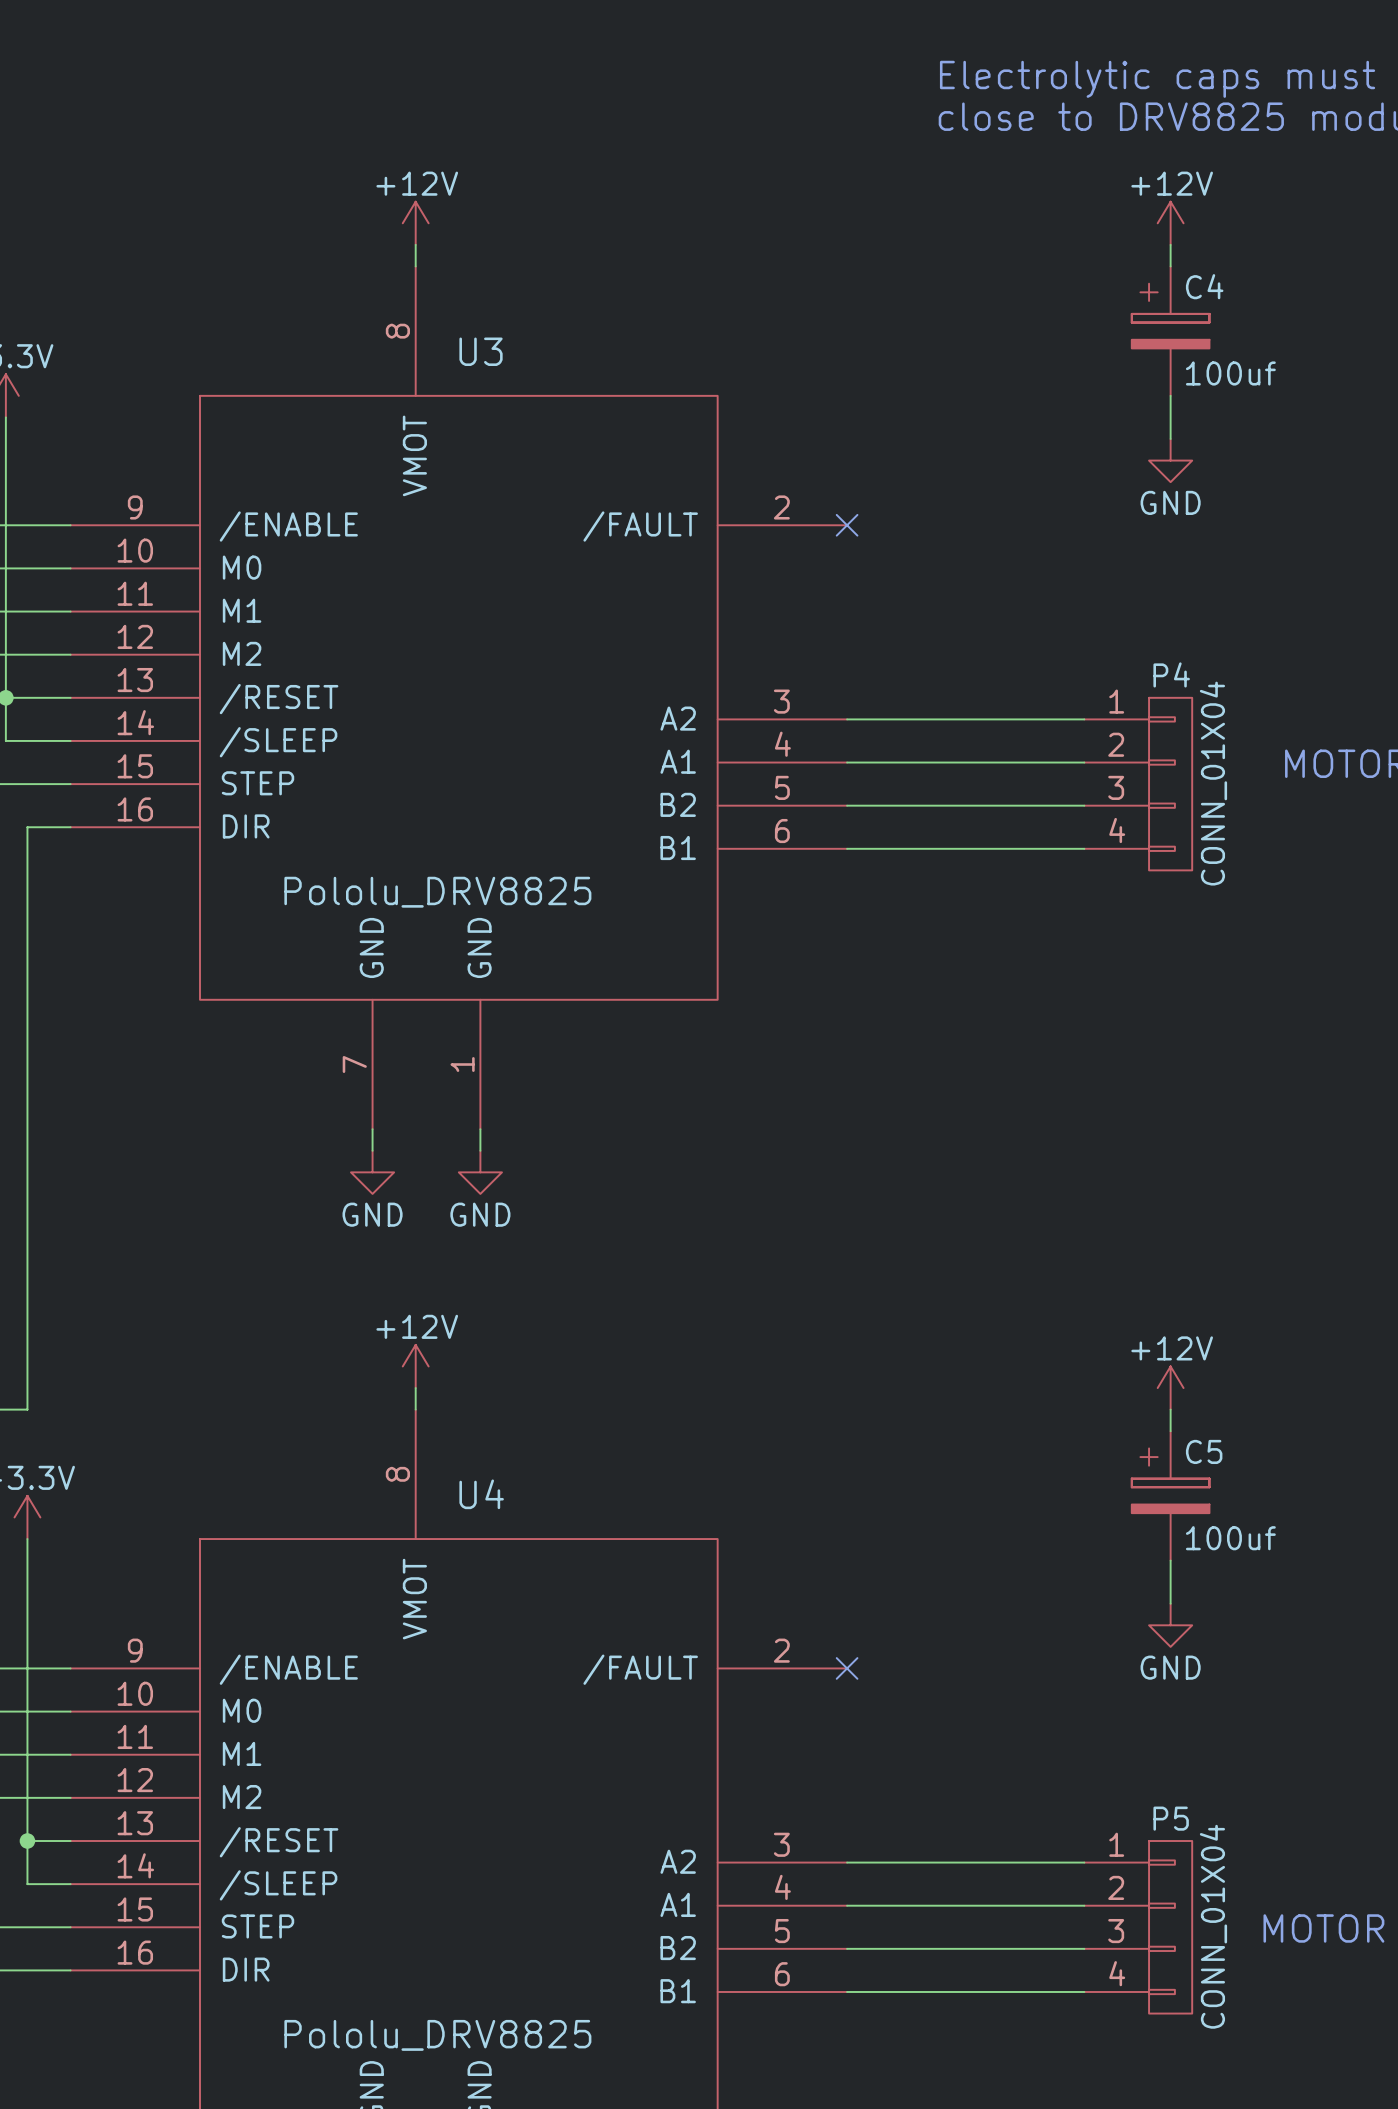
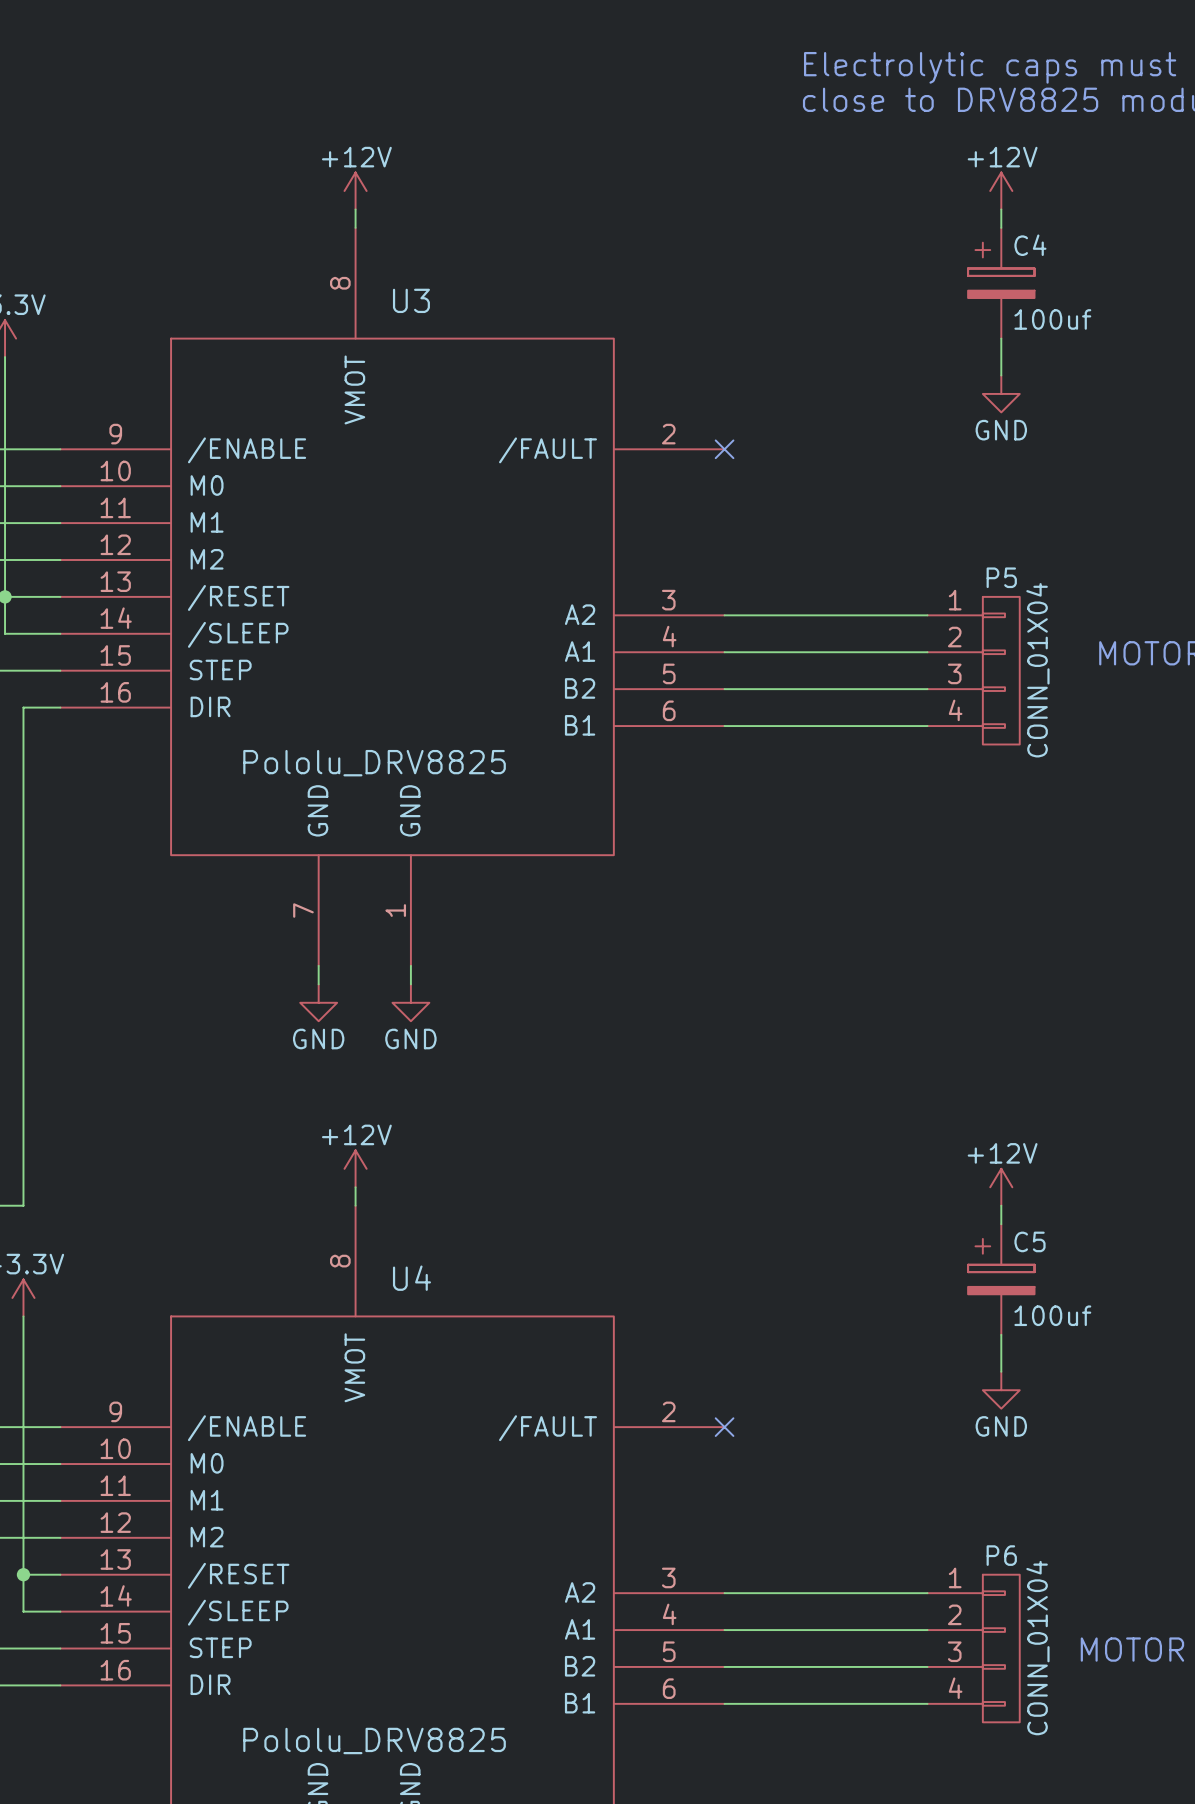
P4 name: P4 (1171, 674) -> P5 (1001, 577)
P5 name: P5 (1171, 1818) -> P6 (1001, 1555)

